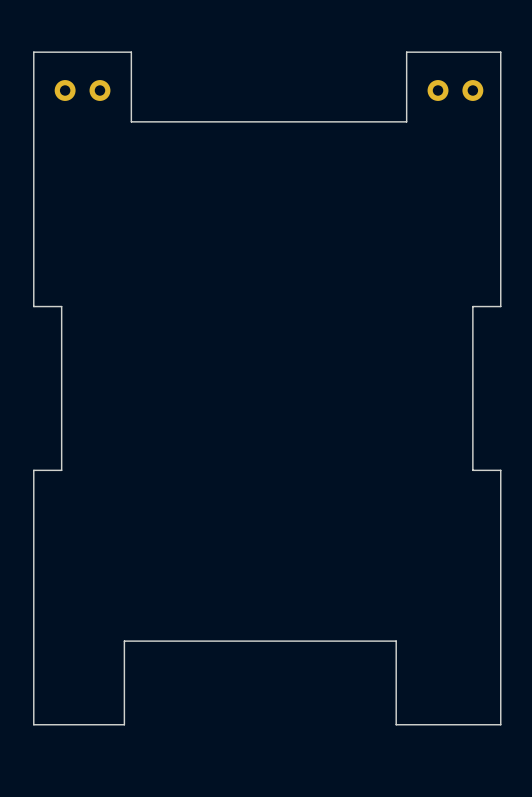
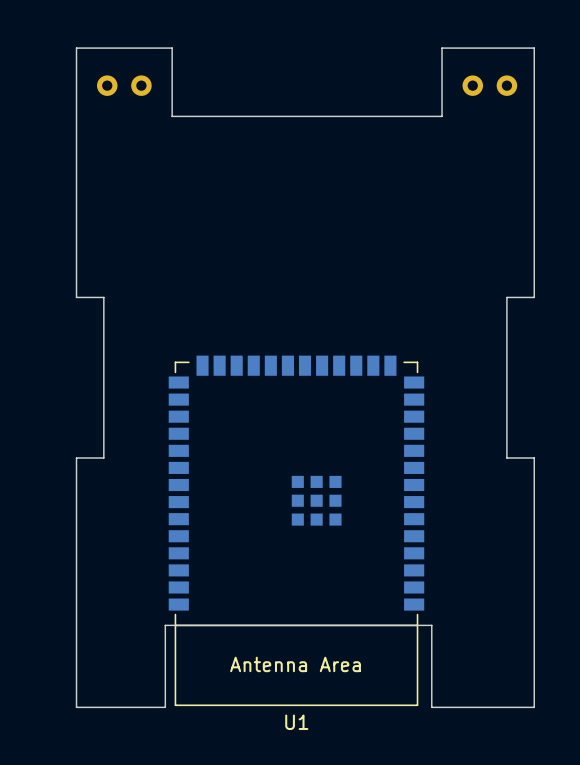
U1: none -> (296, 530)

